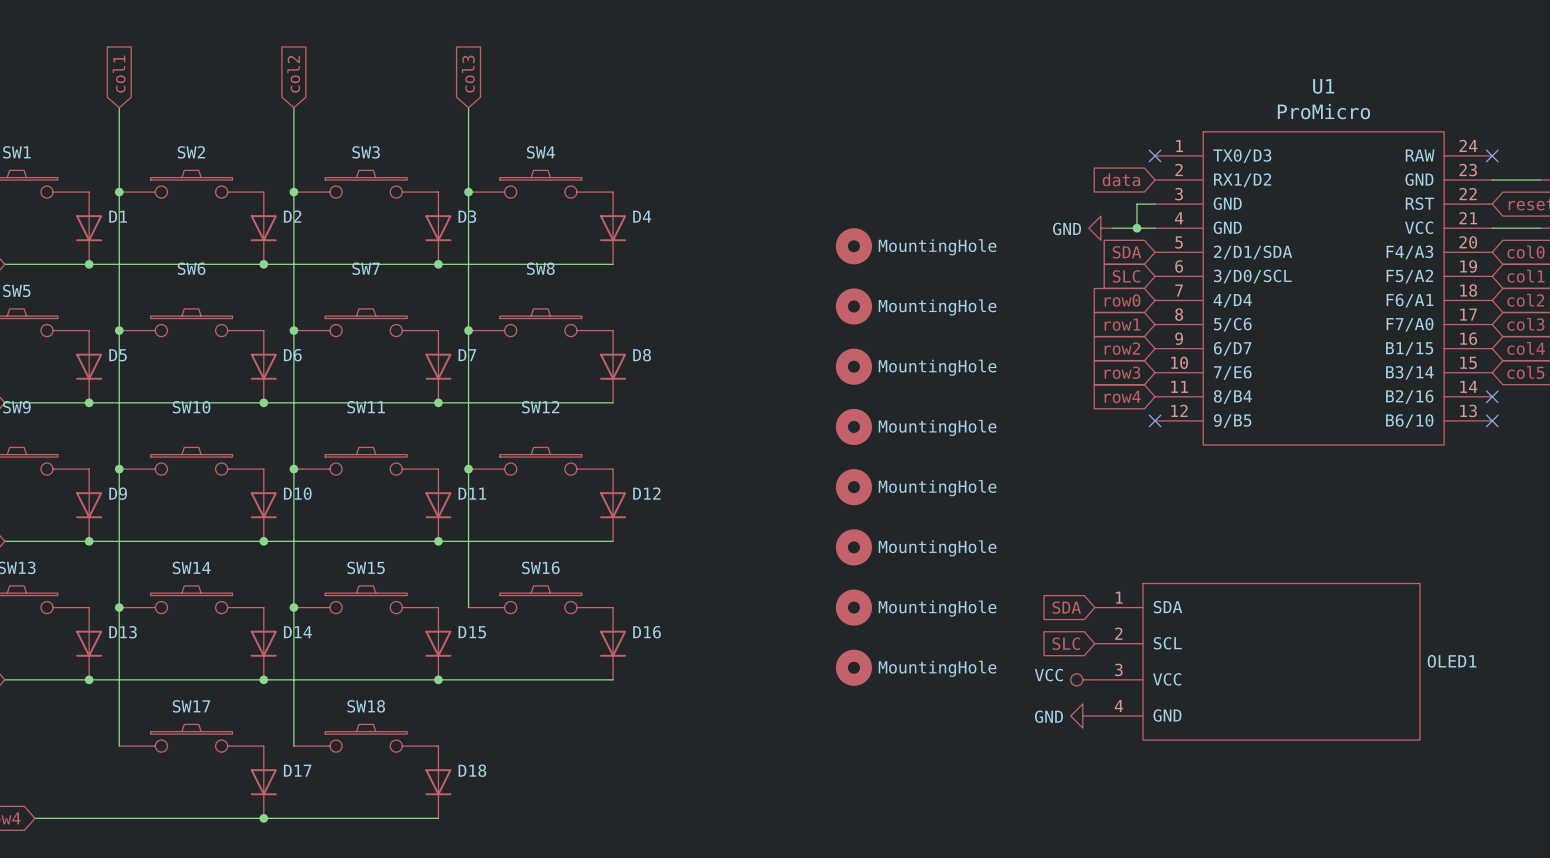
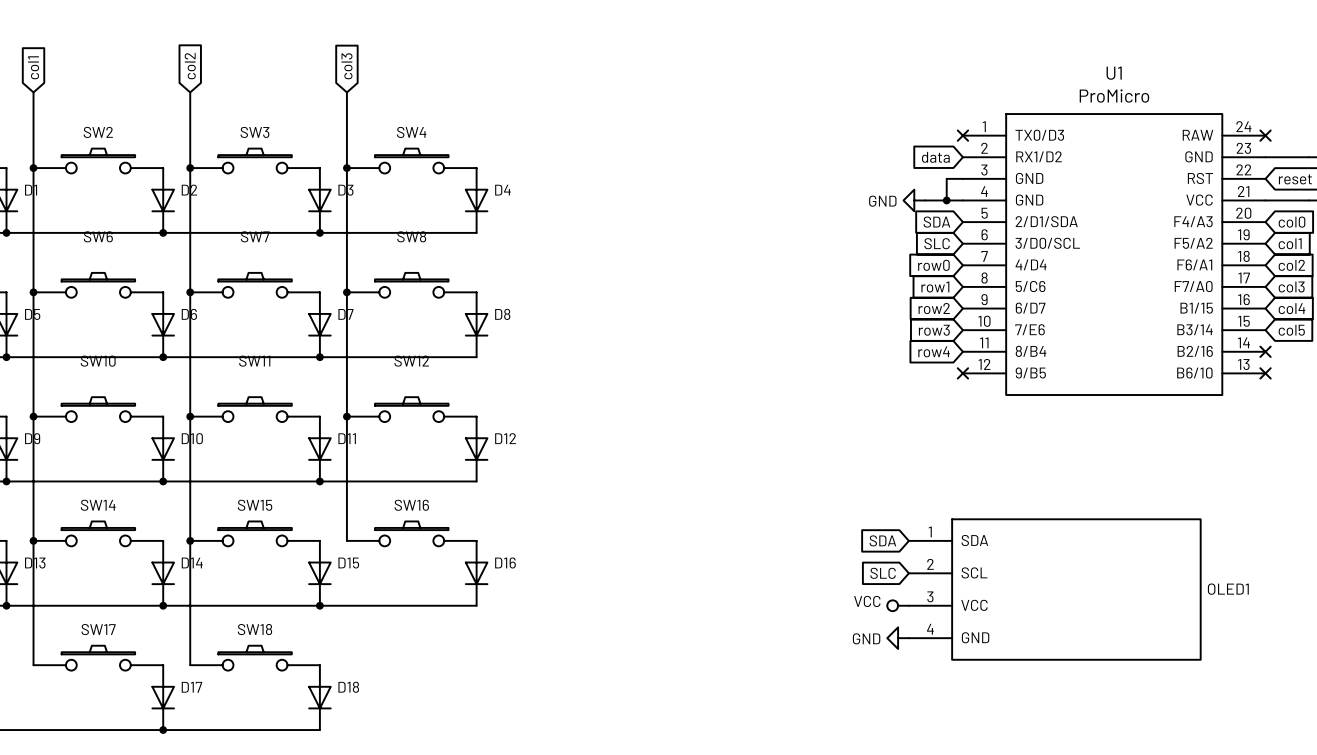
part: MountingHole (853, 246) -> none
part: MountingHole (853, 306) -> none
part: MountingHole (853, 366) -> none
part: MountingHole (853, 426) -> none
part: MountingHole (853, 487) -> none
part: MountingHole (853, 547) -> none
part: MountingHole (853, 607) -> none
part: MountingHole (853, 667) -> none

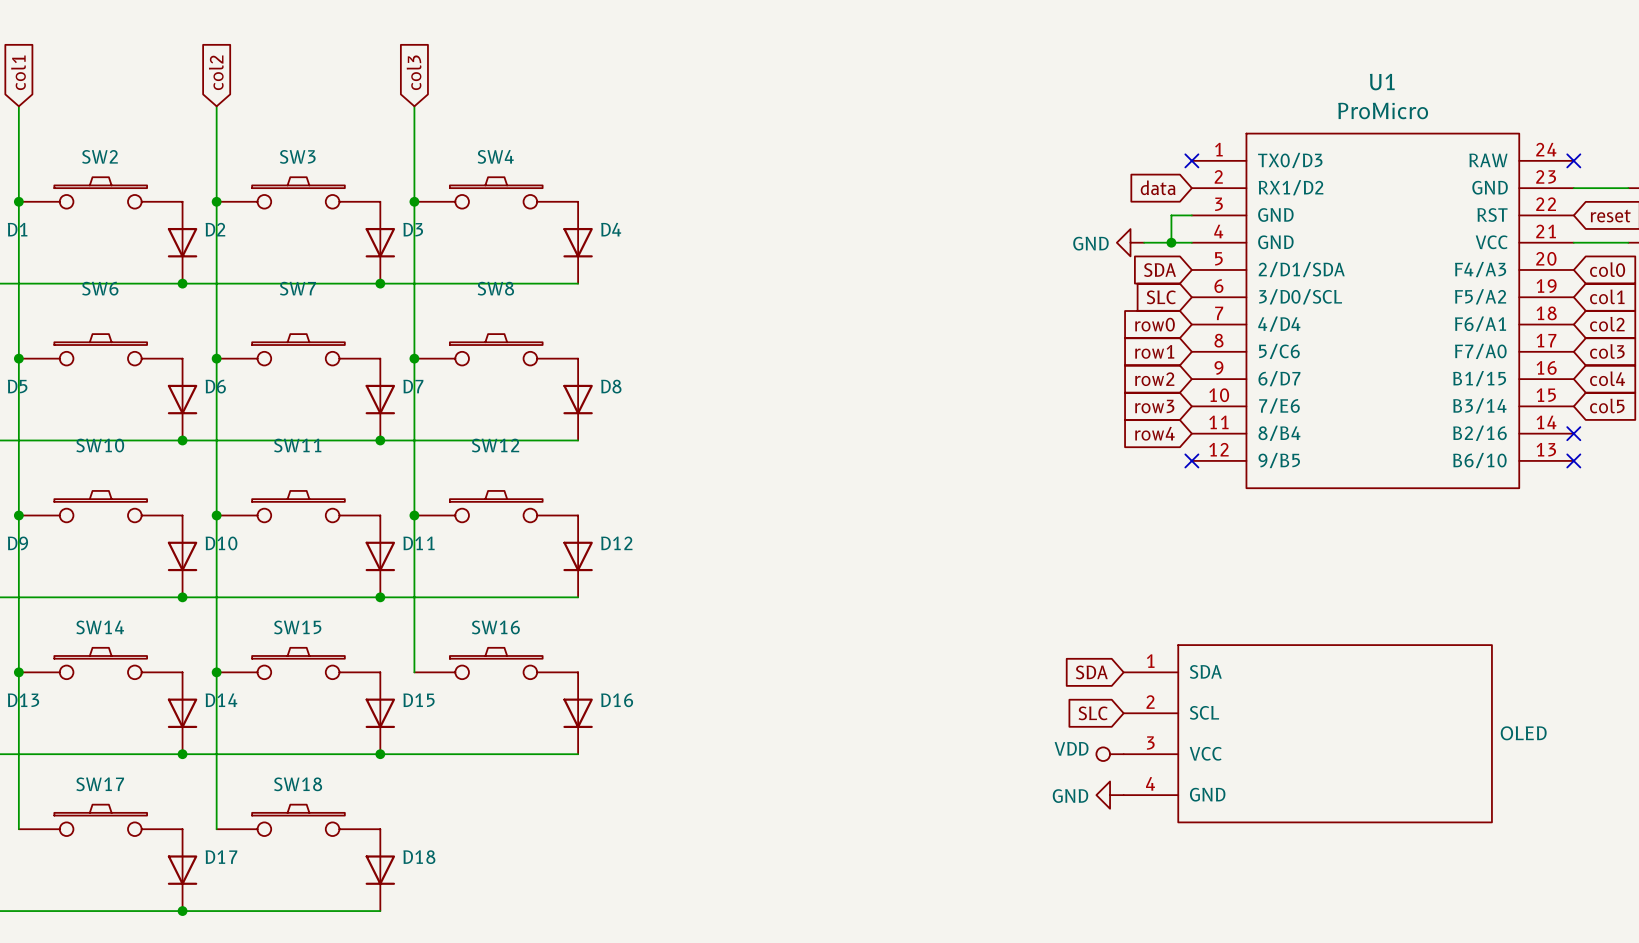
OLED1 name: OLED1 (1228, 589) -> OLED (1523, 733)
power symbol: VCC (898, 605) -> VDD (1110, 754)

